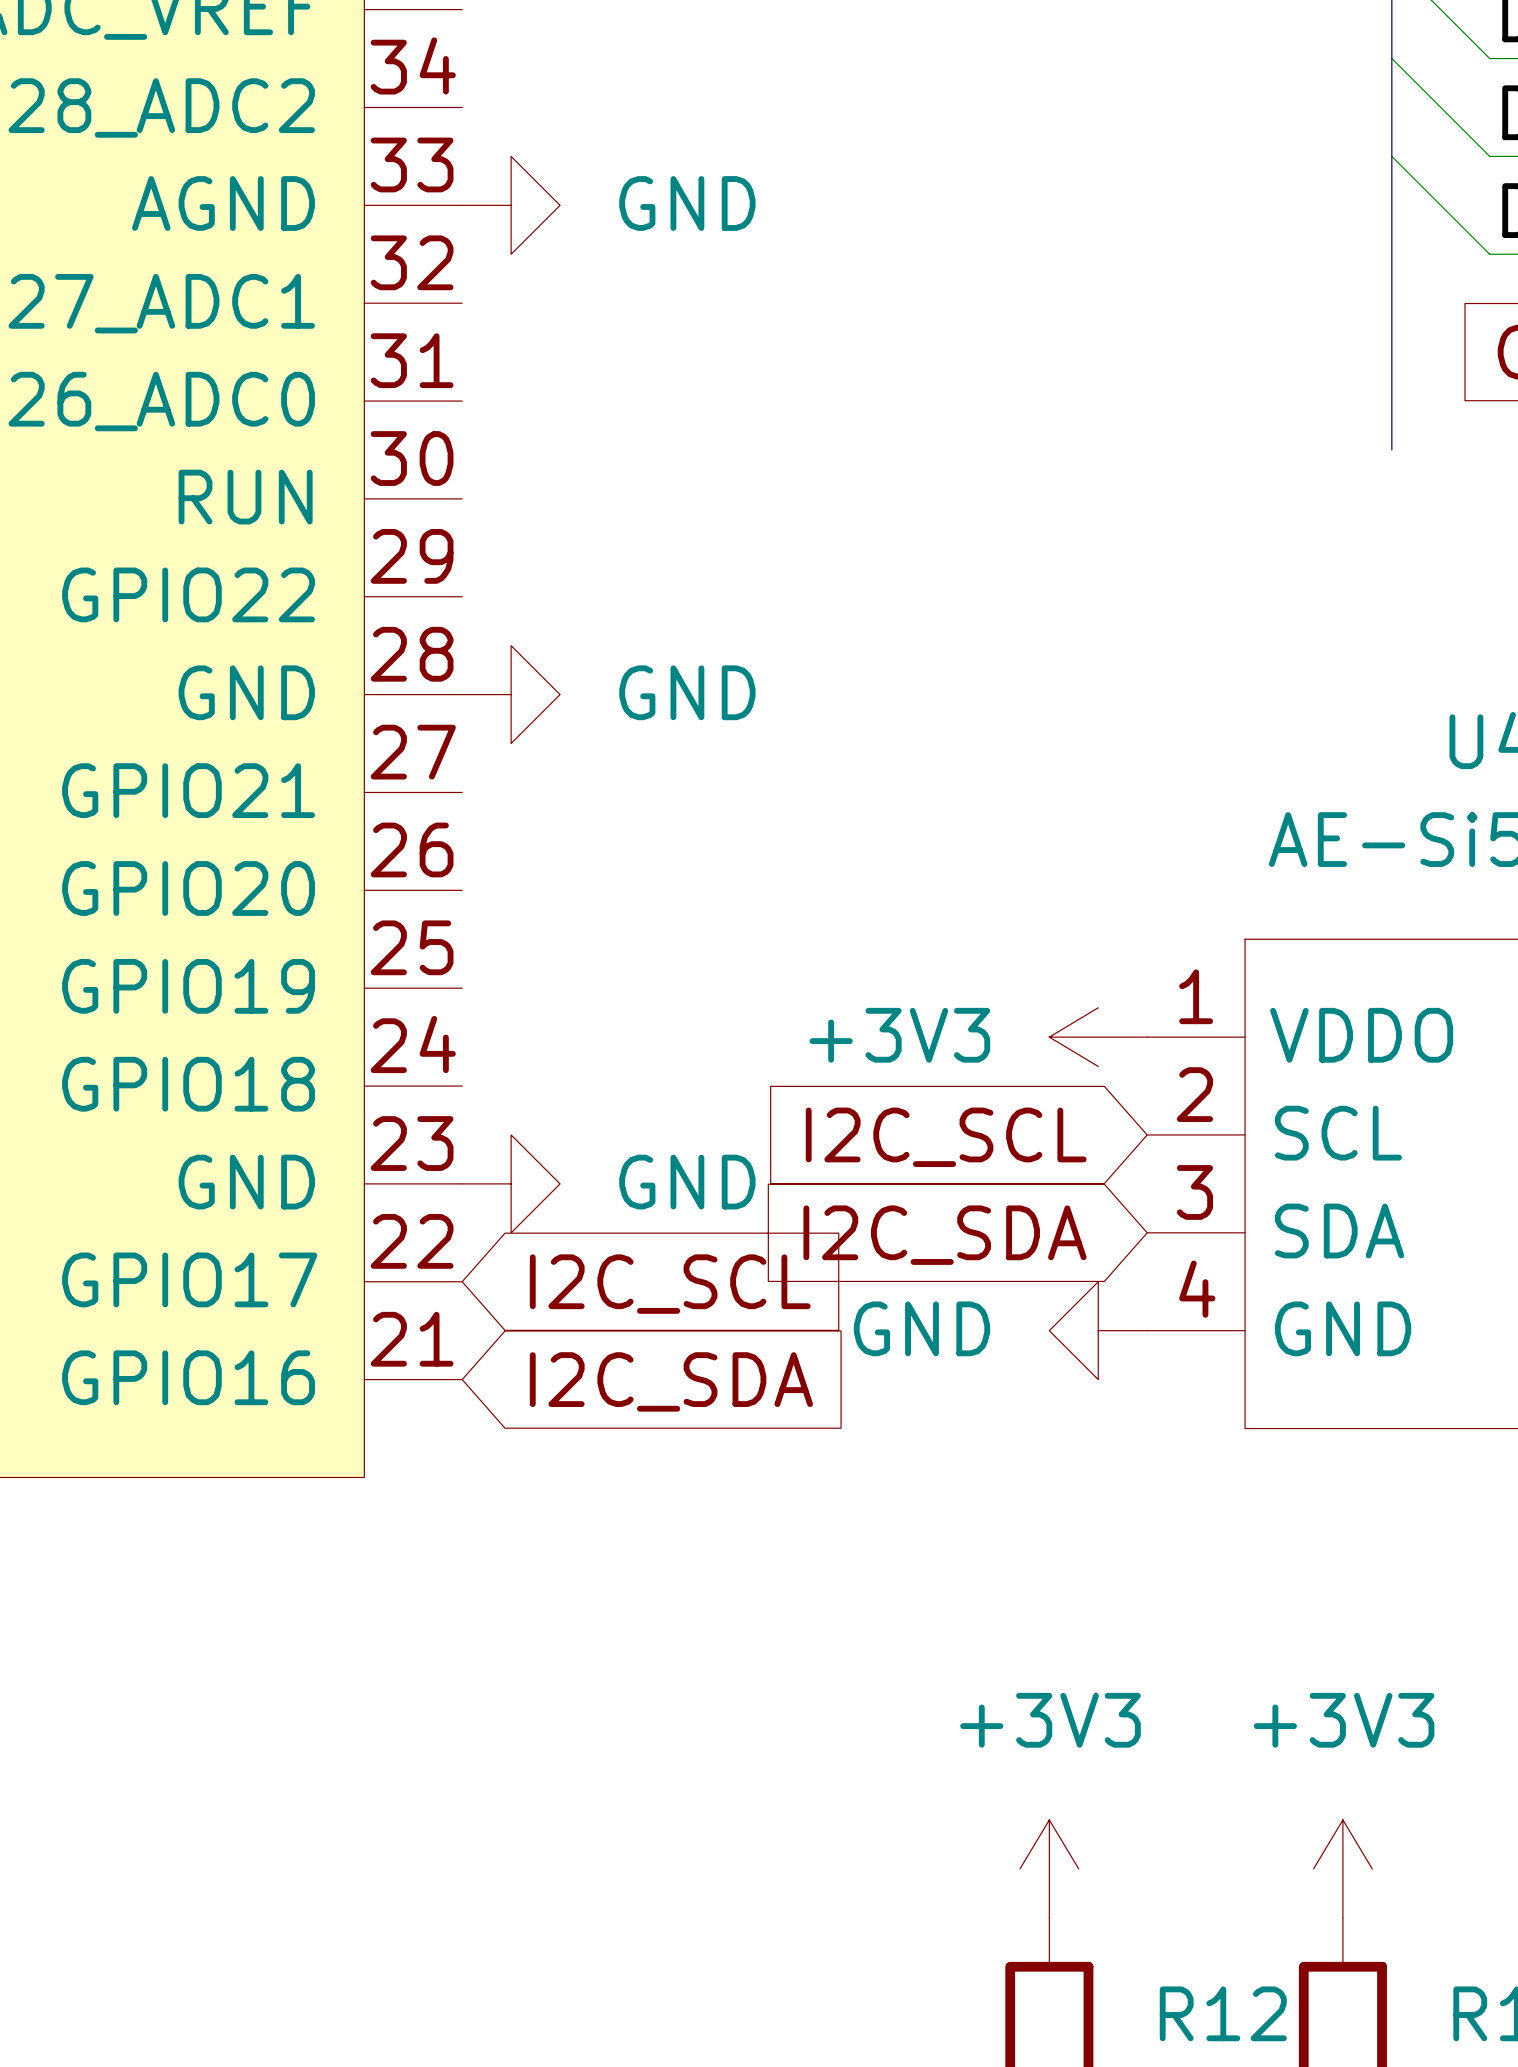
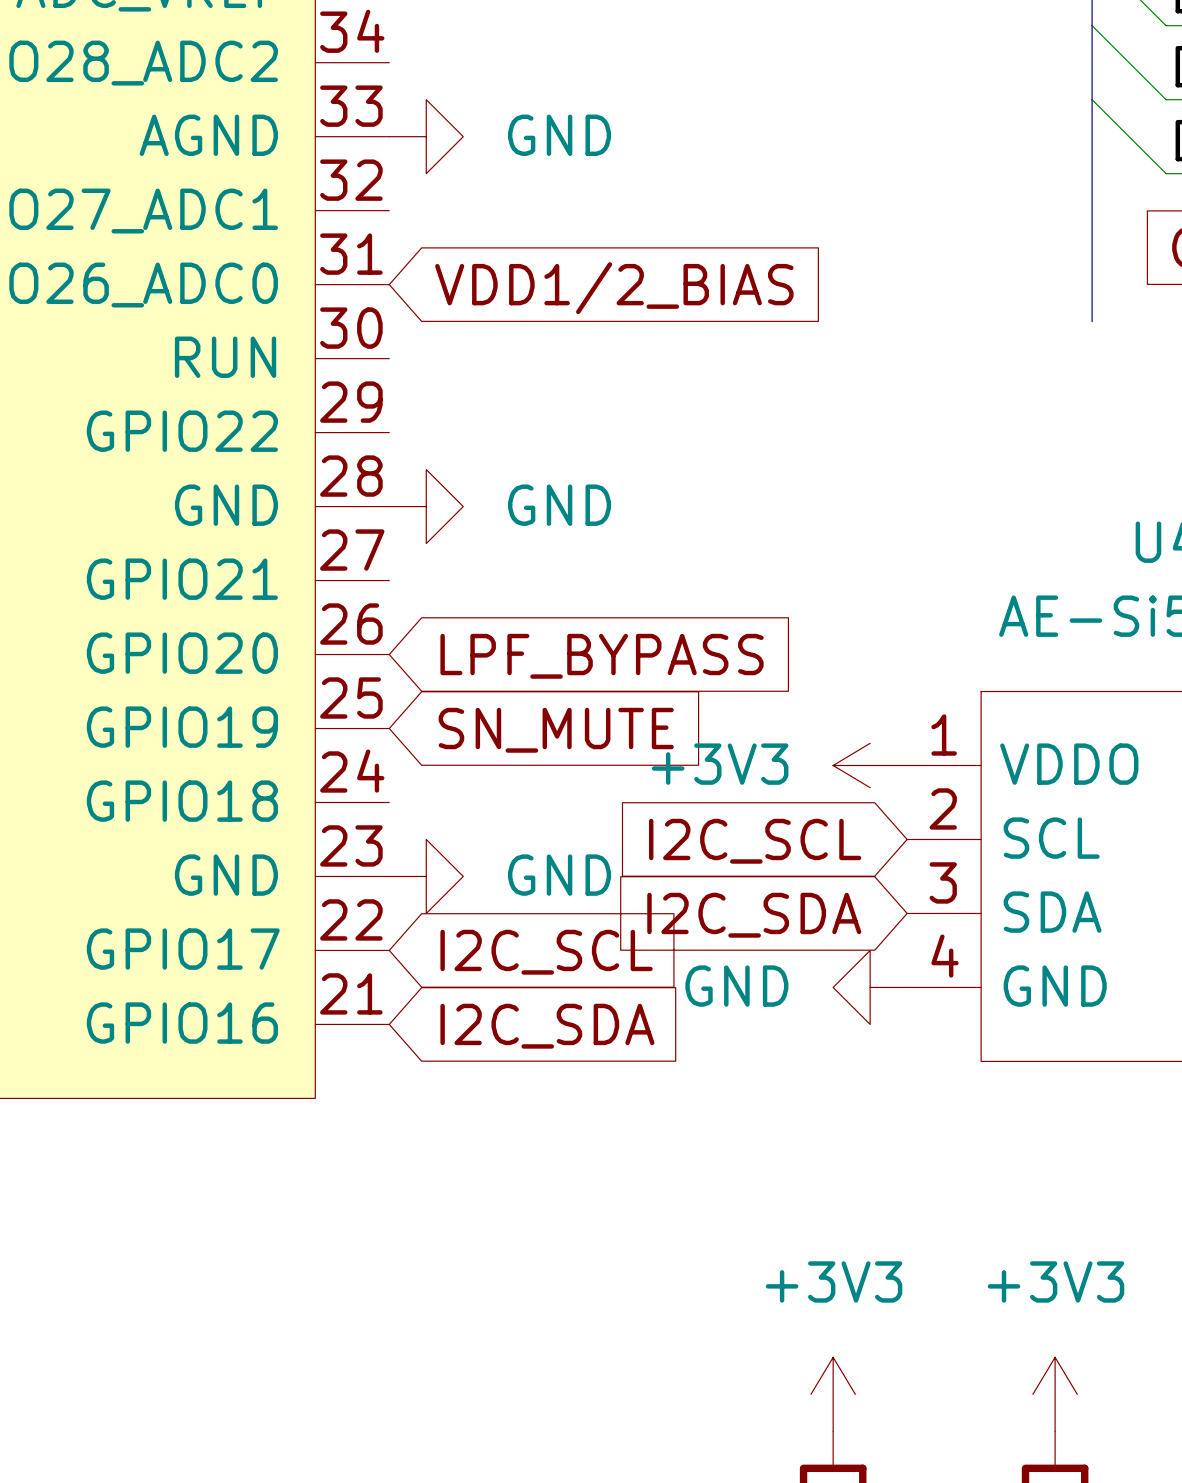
global label: none -> VDD1/2_BIAS (614, 288)
global label: none -> LPF_BYPASS (602, 656)
global label: none -> SN_MUTE (556, 730)

